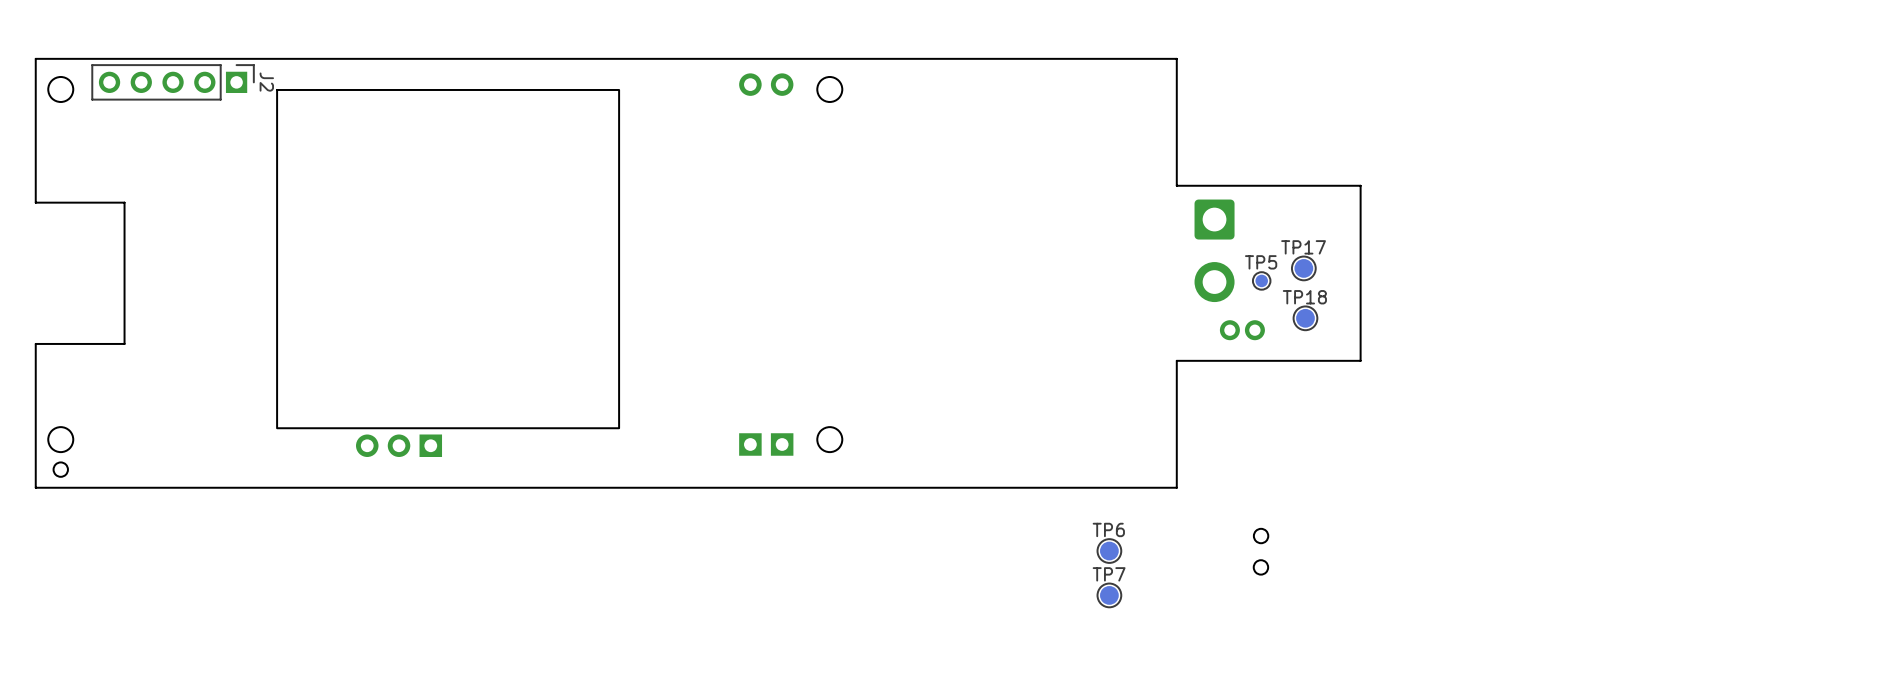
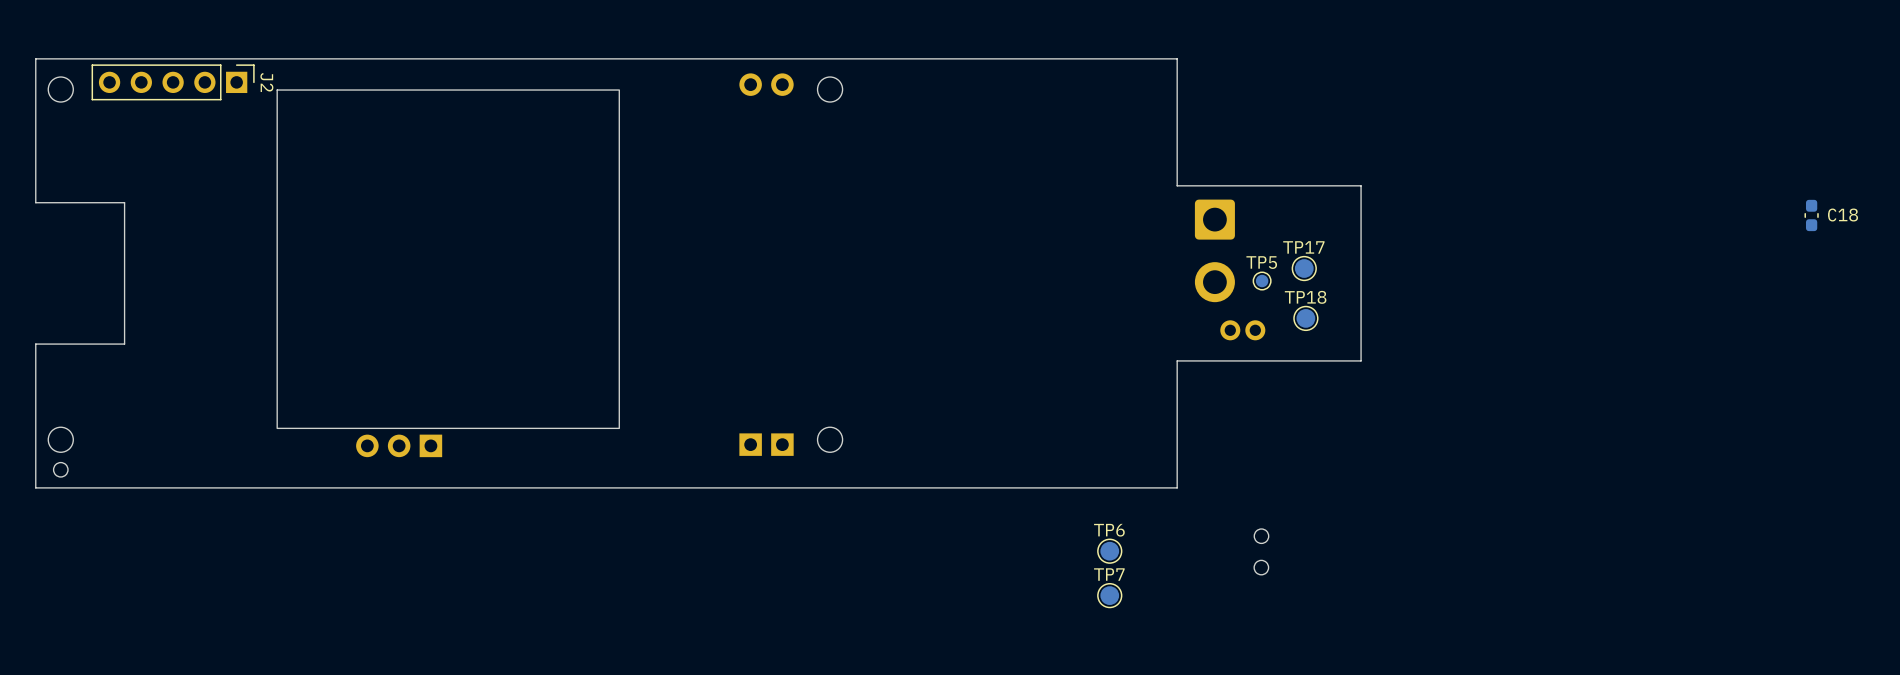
C18: none -> (1811, 215)

